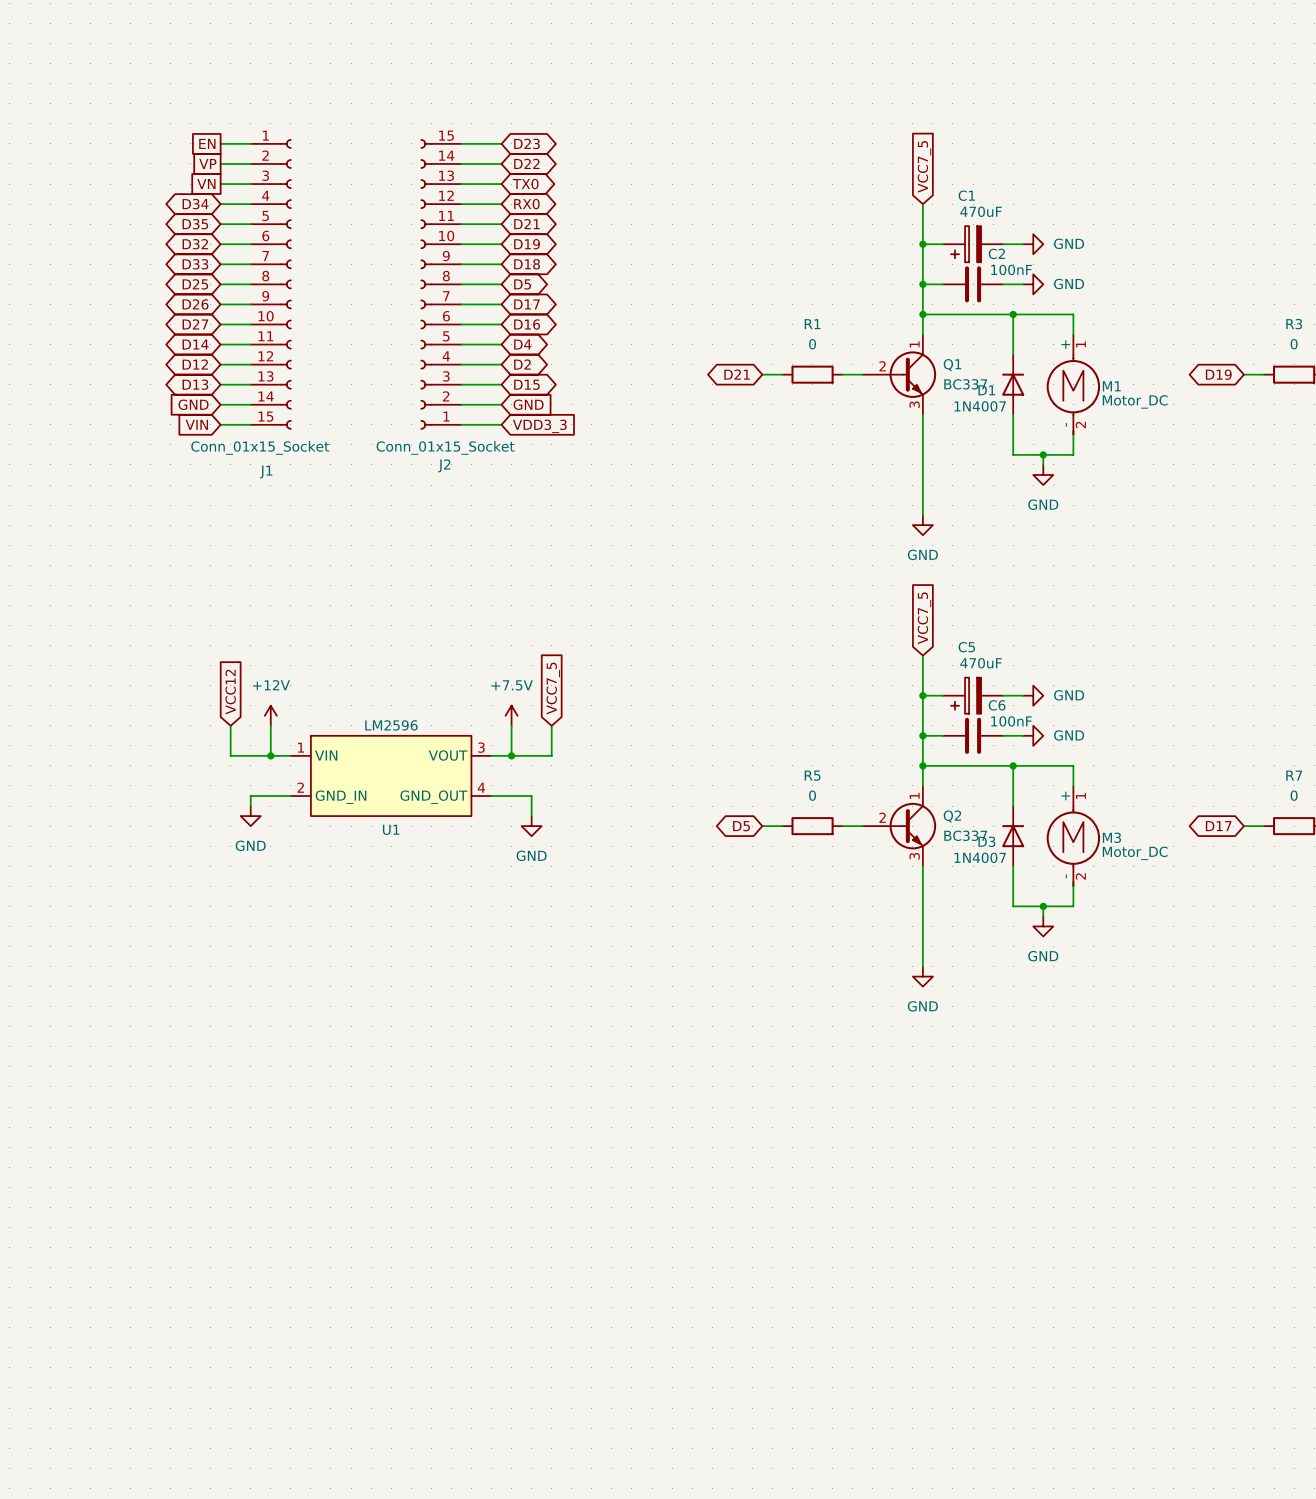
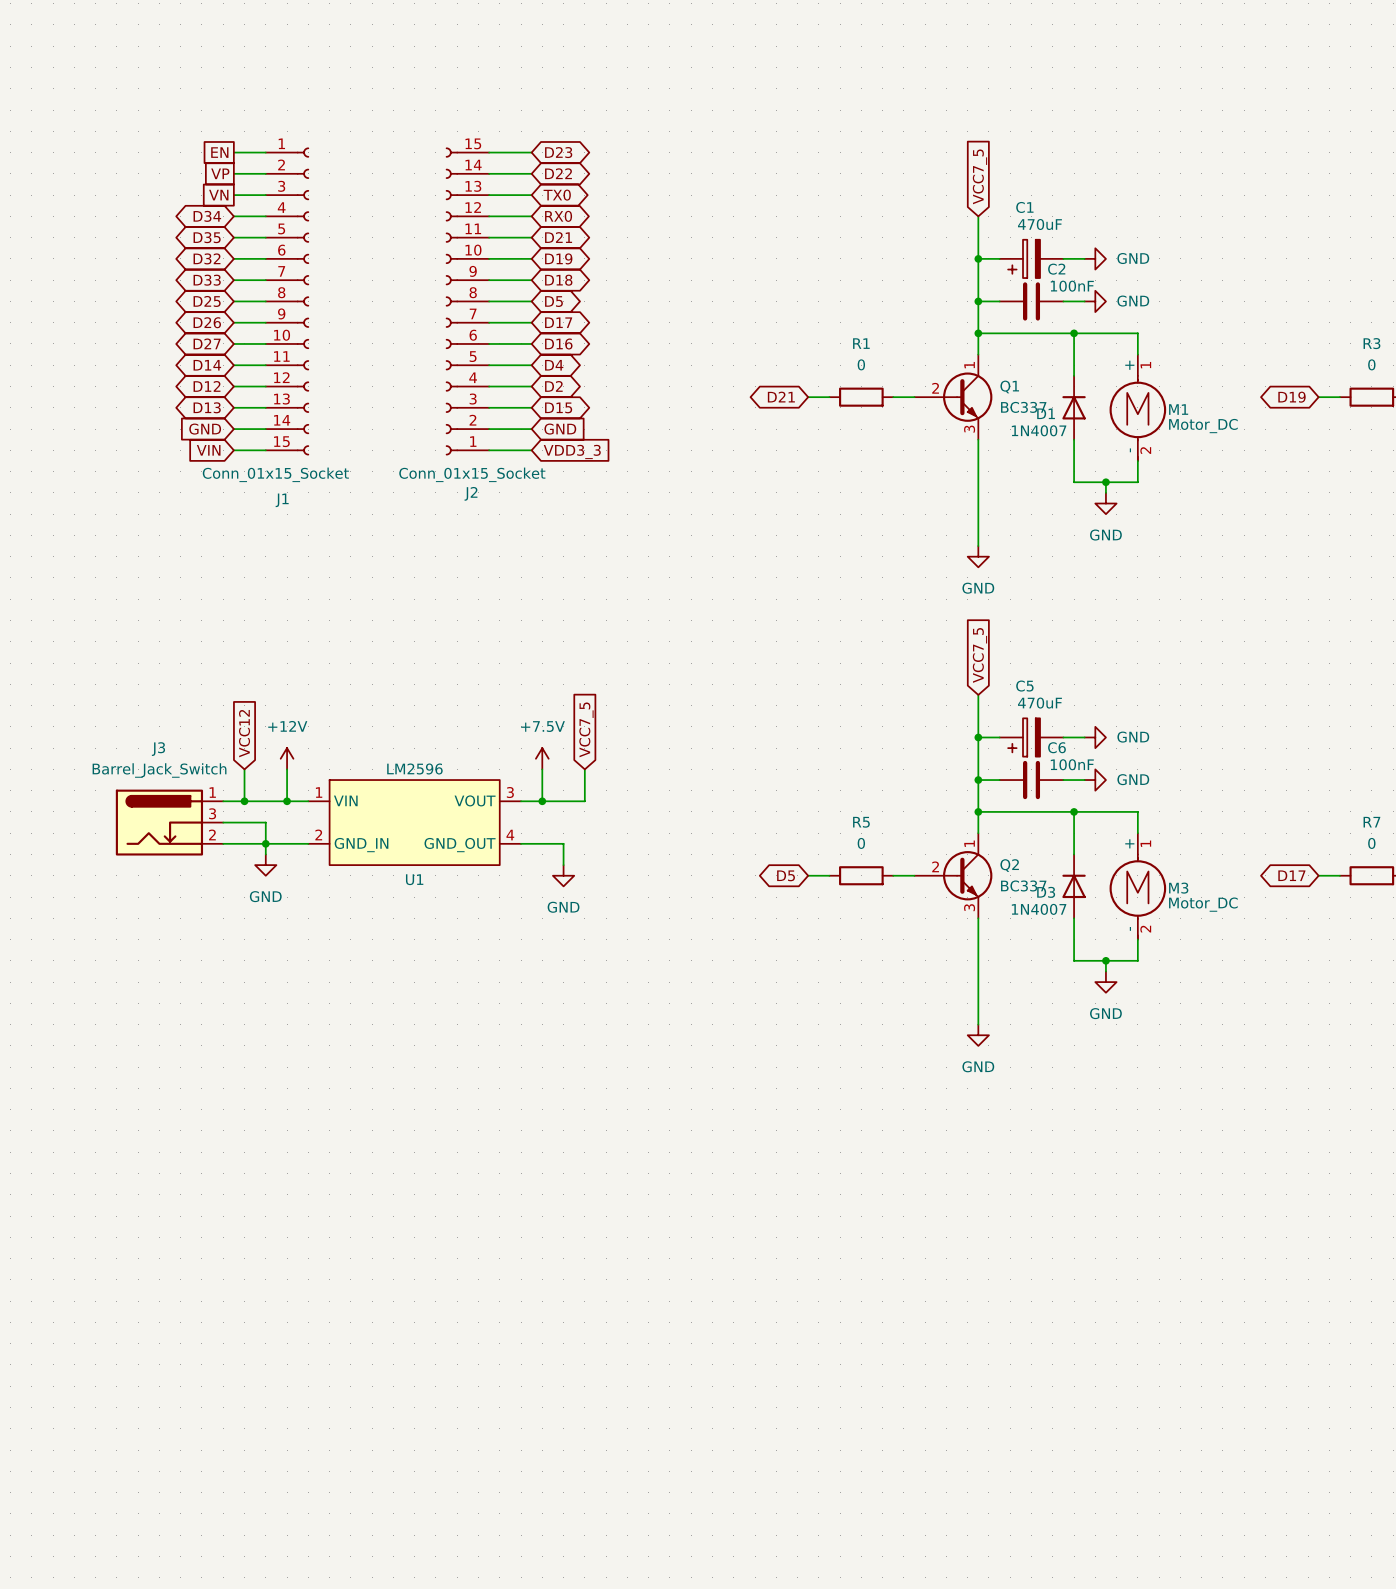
wire: none -> (223, 801) (244, 801)
junction: none -> (244, 801)
J3: none -> Barrel_Jack_Switch (169, 822)
wire: none -> (223, 822) (265, 822) (265, 843) (223, 843)
junction: none -> (265, 843)

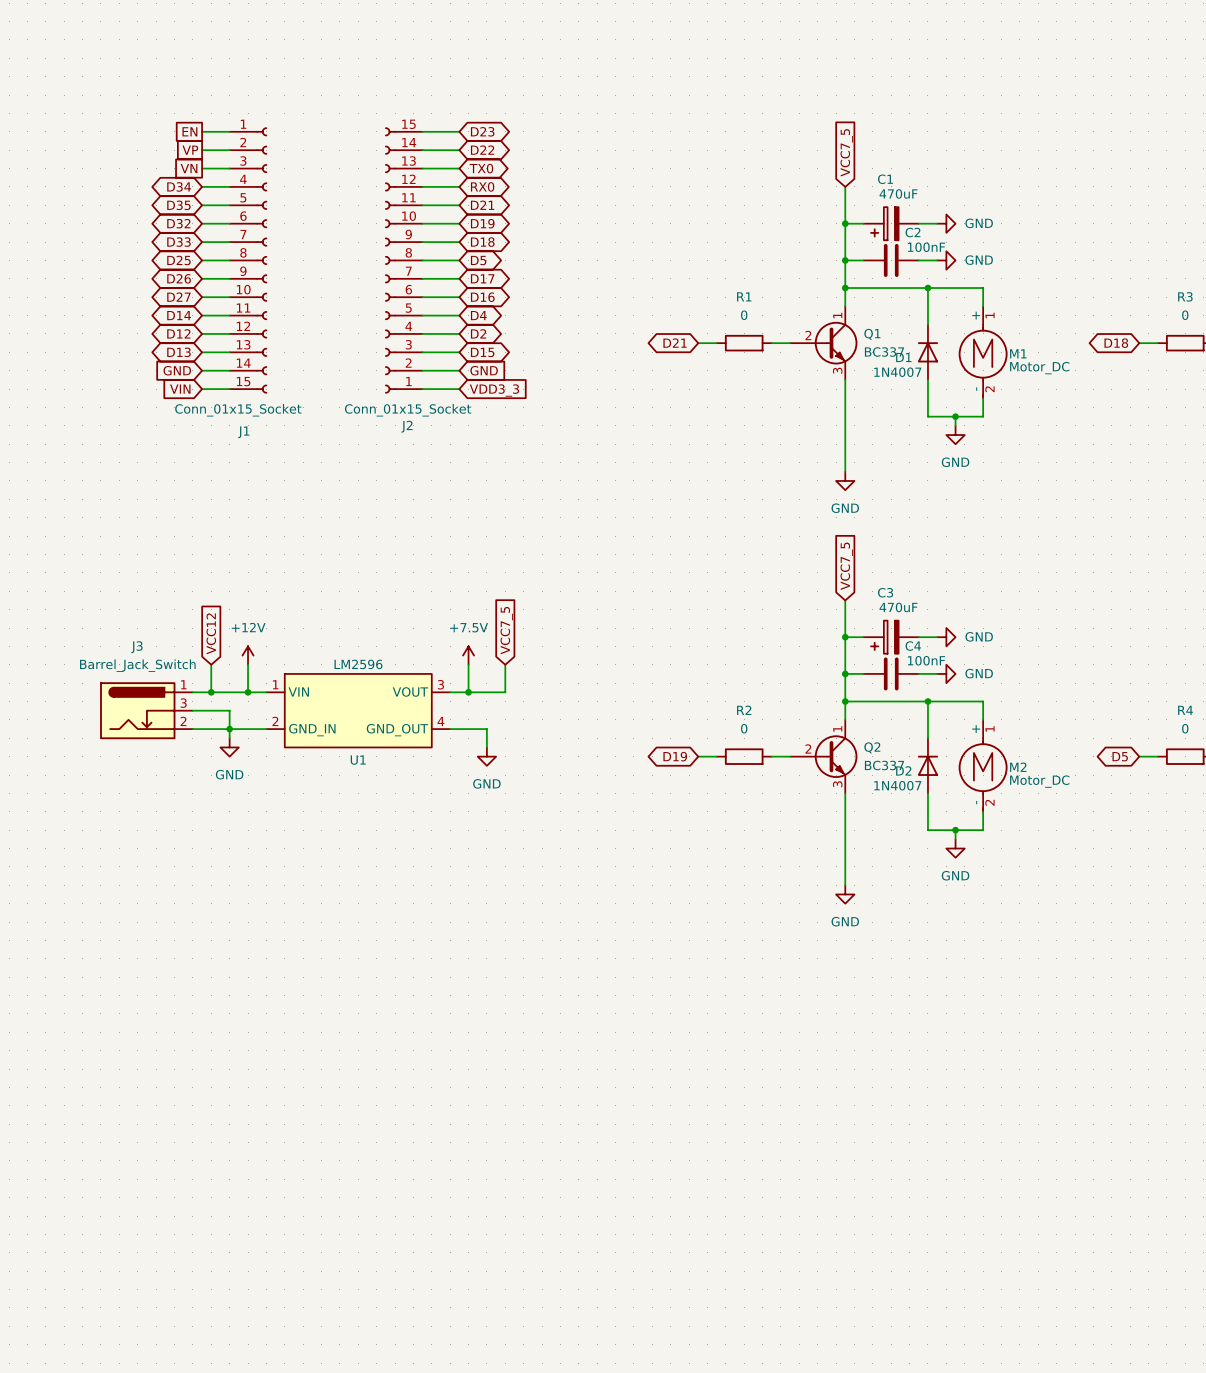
global label: D19 (1292, 397) -> D18 (1116, 343)
C5 name: C5 (1024, 686) -> C3 (885, 592)
C6 name: C6 (1056, 747) -> C4 (913, 646)
R5 name: R5 (861, 822) -> R2 (744, 710)
R7 name: R7 (1371, 822) -> R4 (1185, 710)
global label: D5 (786, 875) -> D19 (675, 756)
global label: D17 (1291, 875) -> D5 (1120, 756)
M3 name: M3 (1178, 888) -> M2 (1018, 767)
D3 name: D3 (1046, 892) -> D2 (903, 770)

